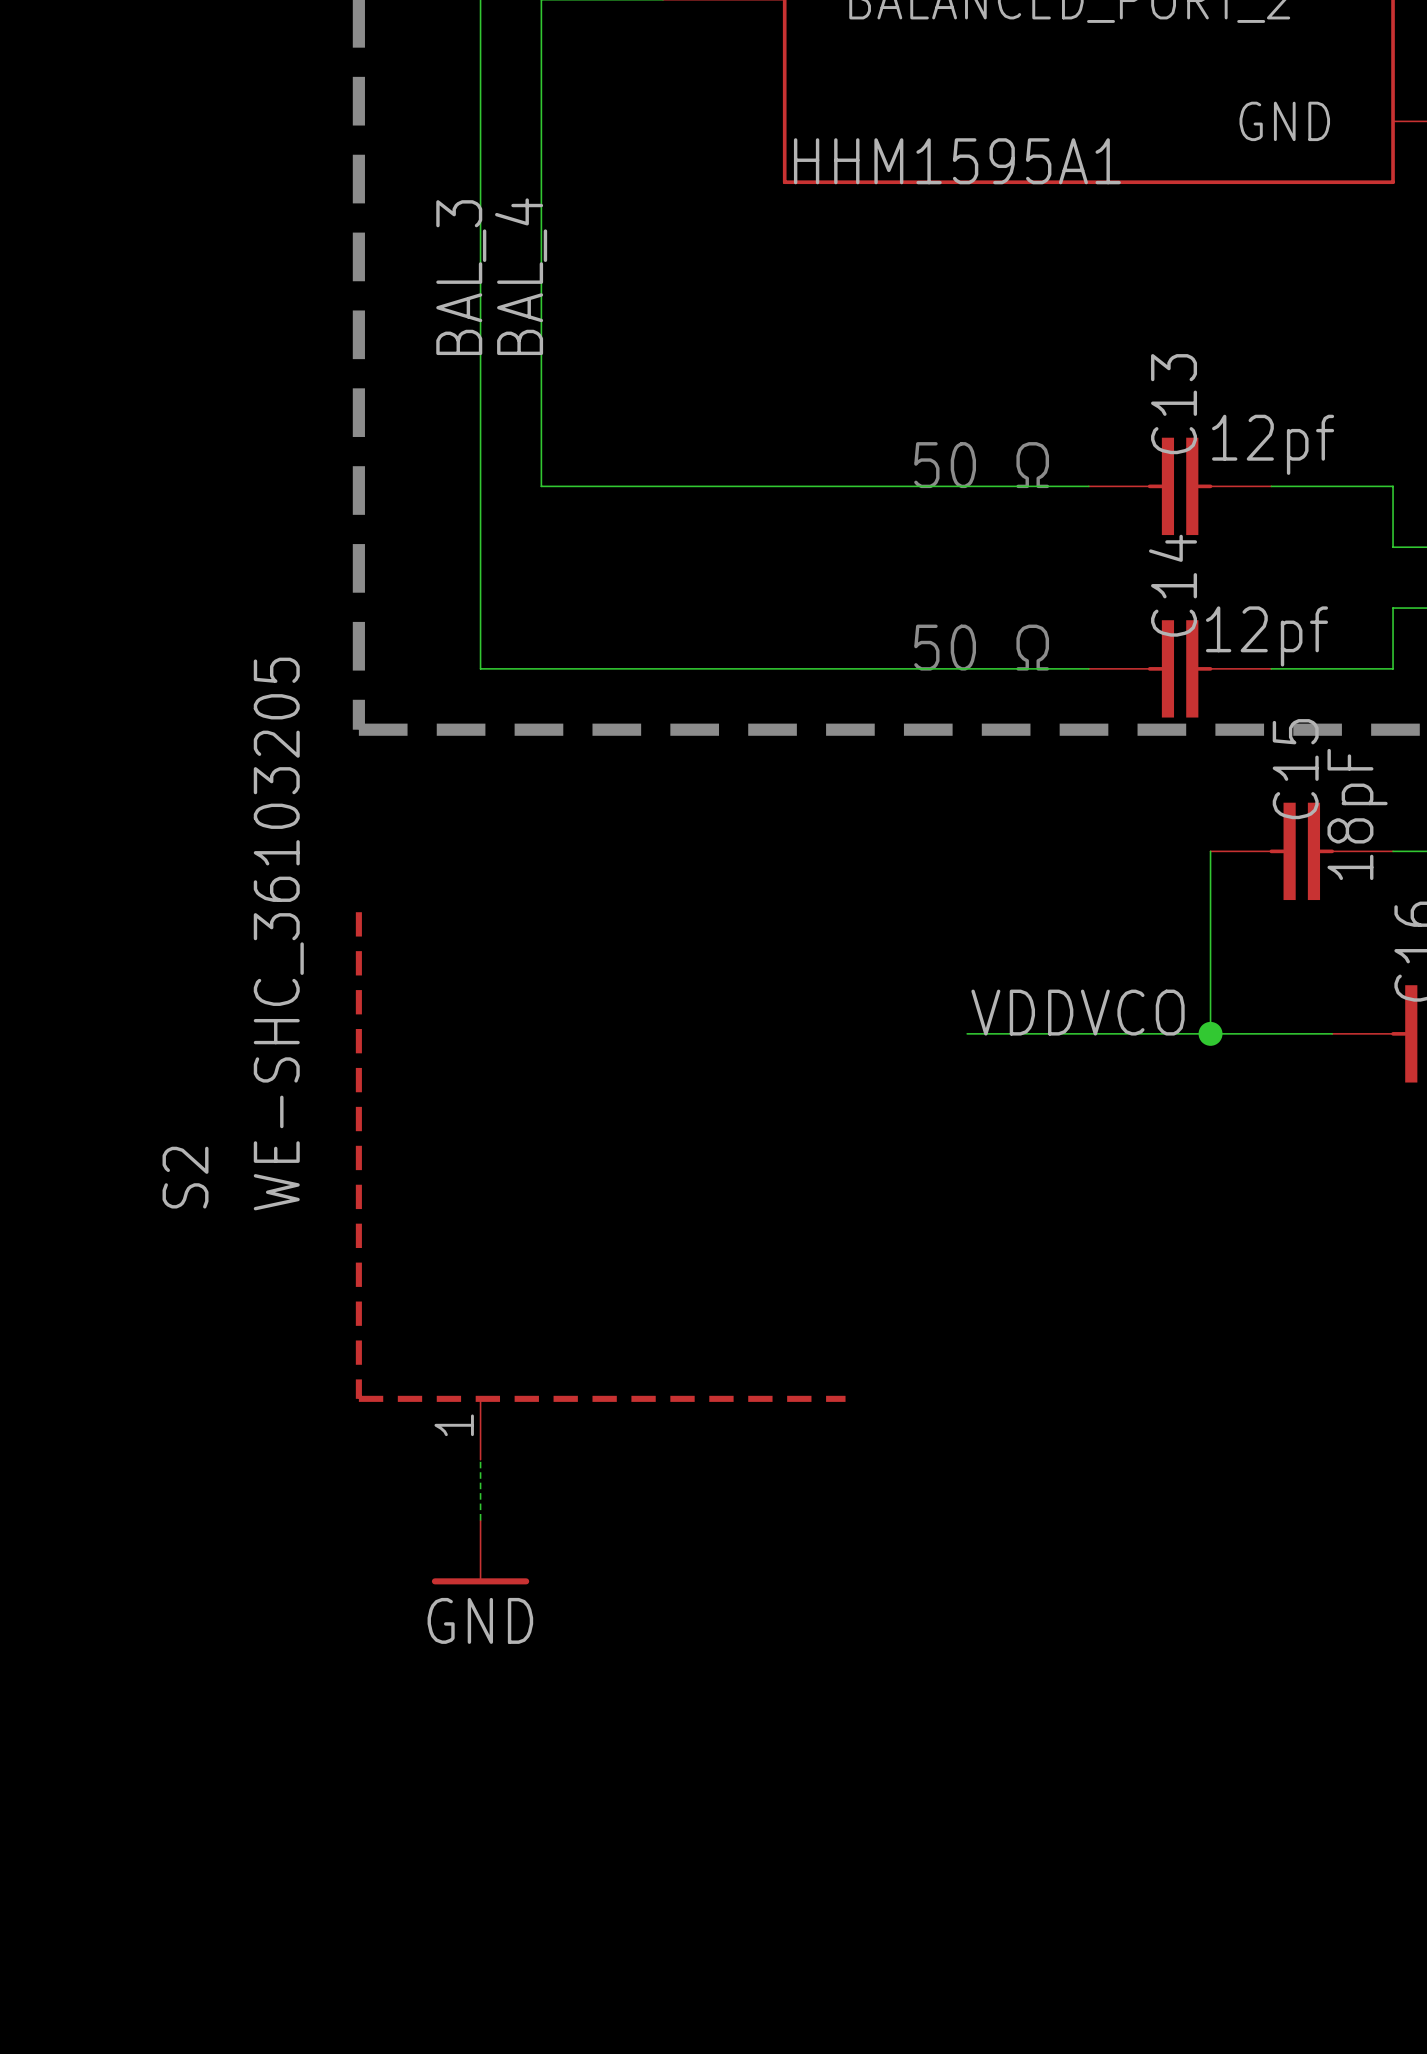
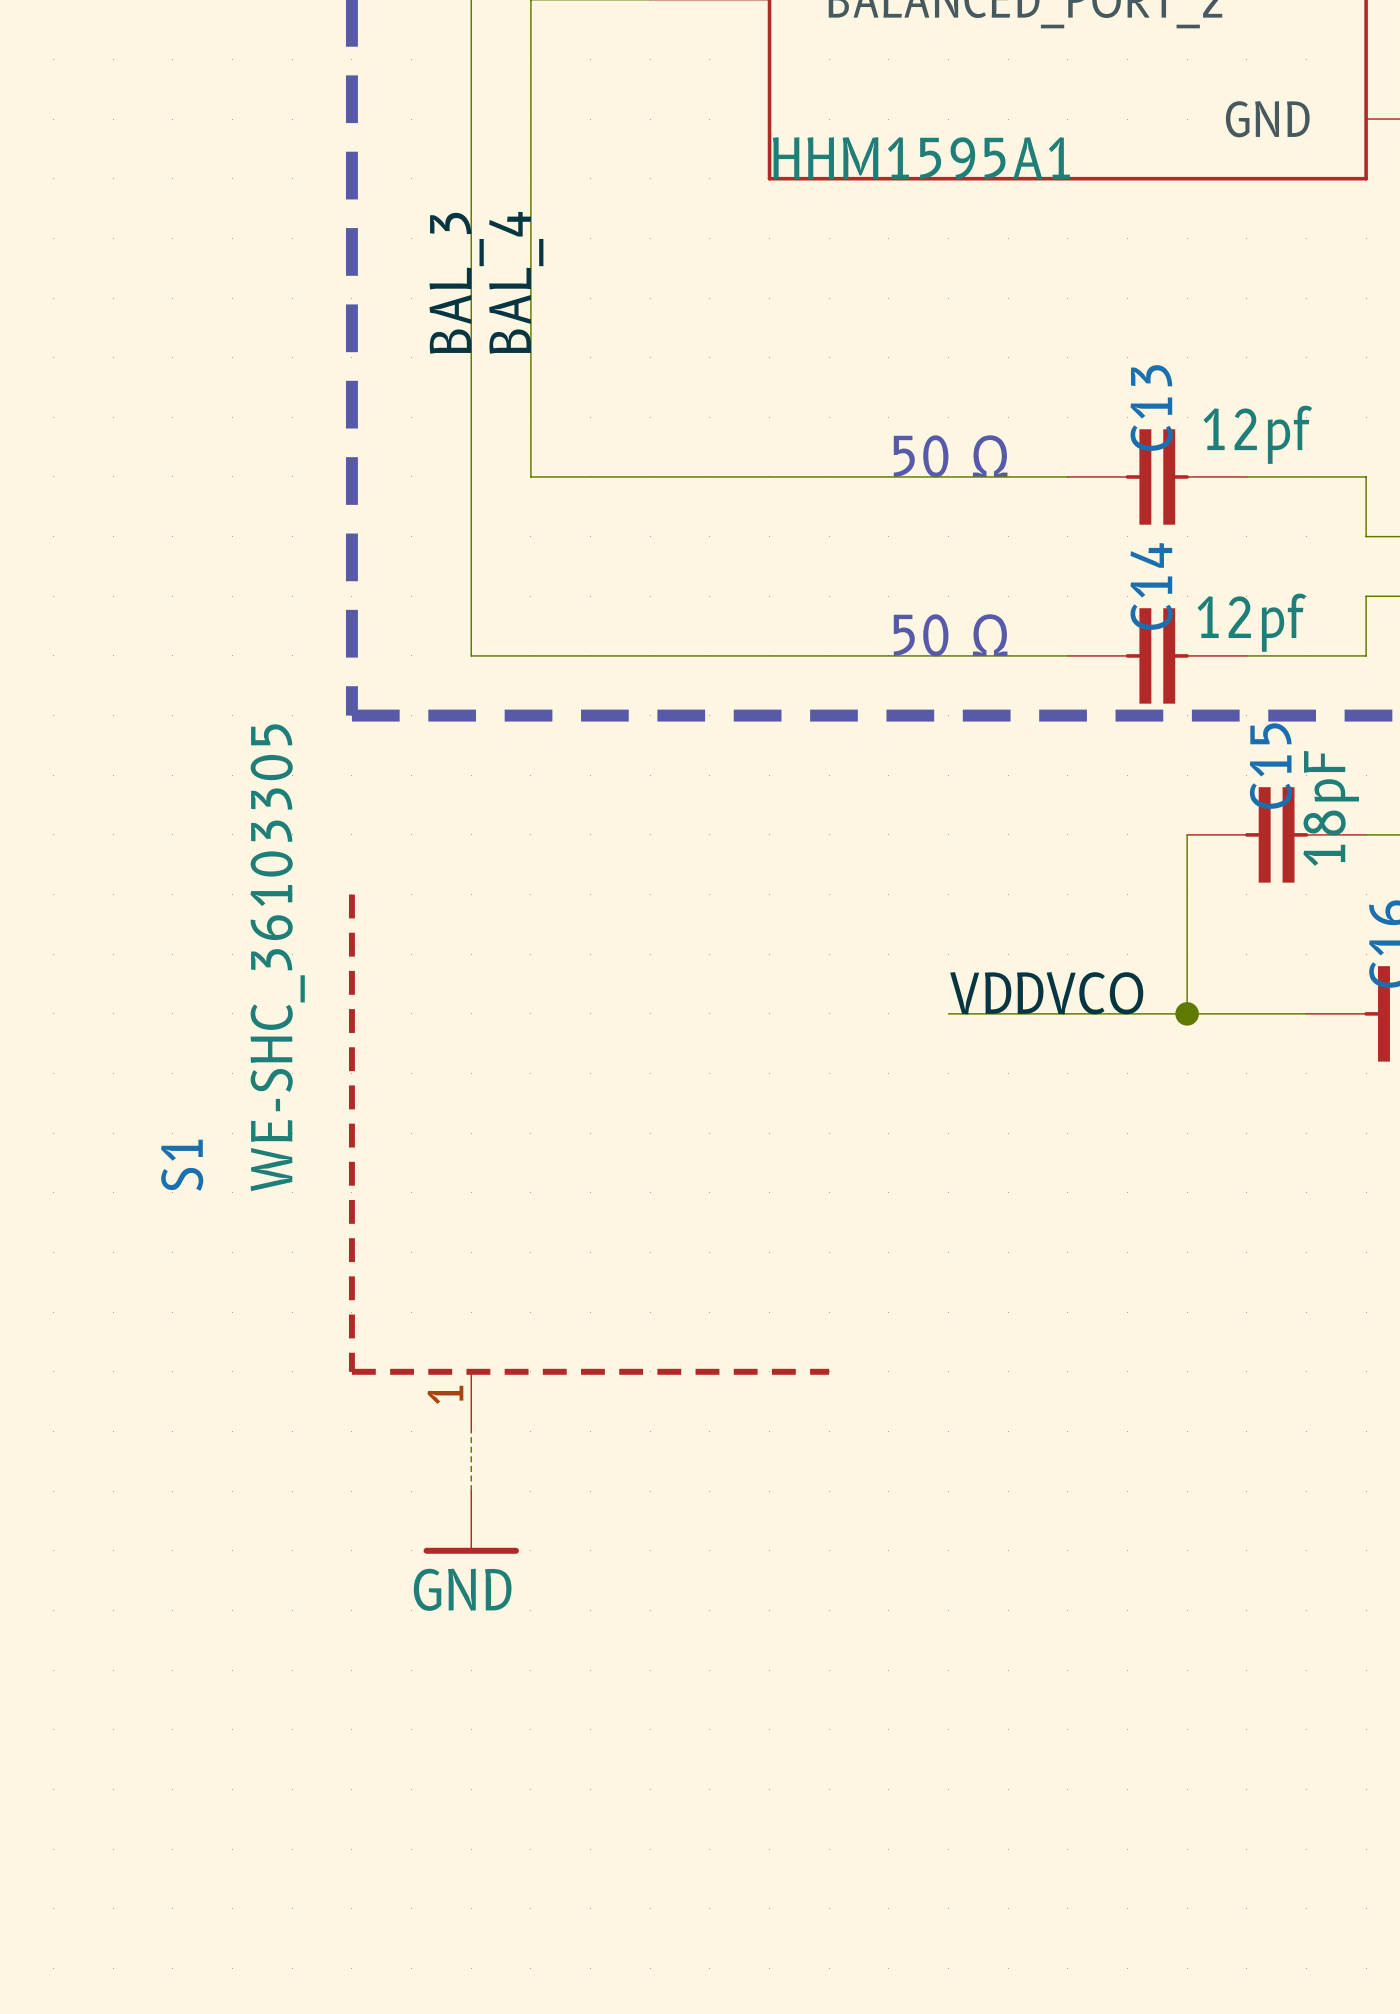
S2 value: WE-SHC_36103205 (278, 933) -> WE-SHC_36103305 (277, 957)
S2 name: S2 (185, 1177) -> S1 (182, 1165)

